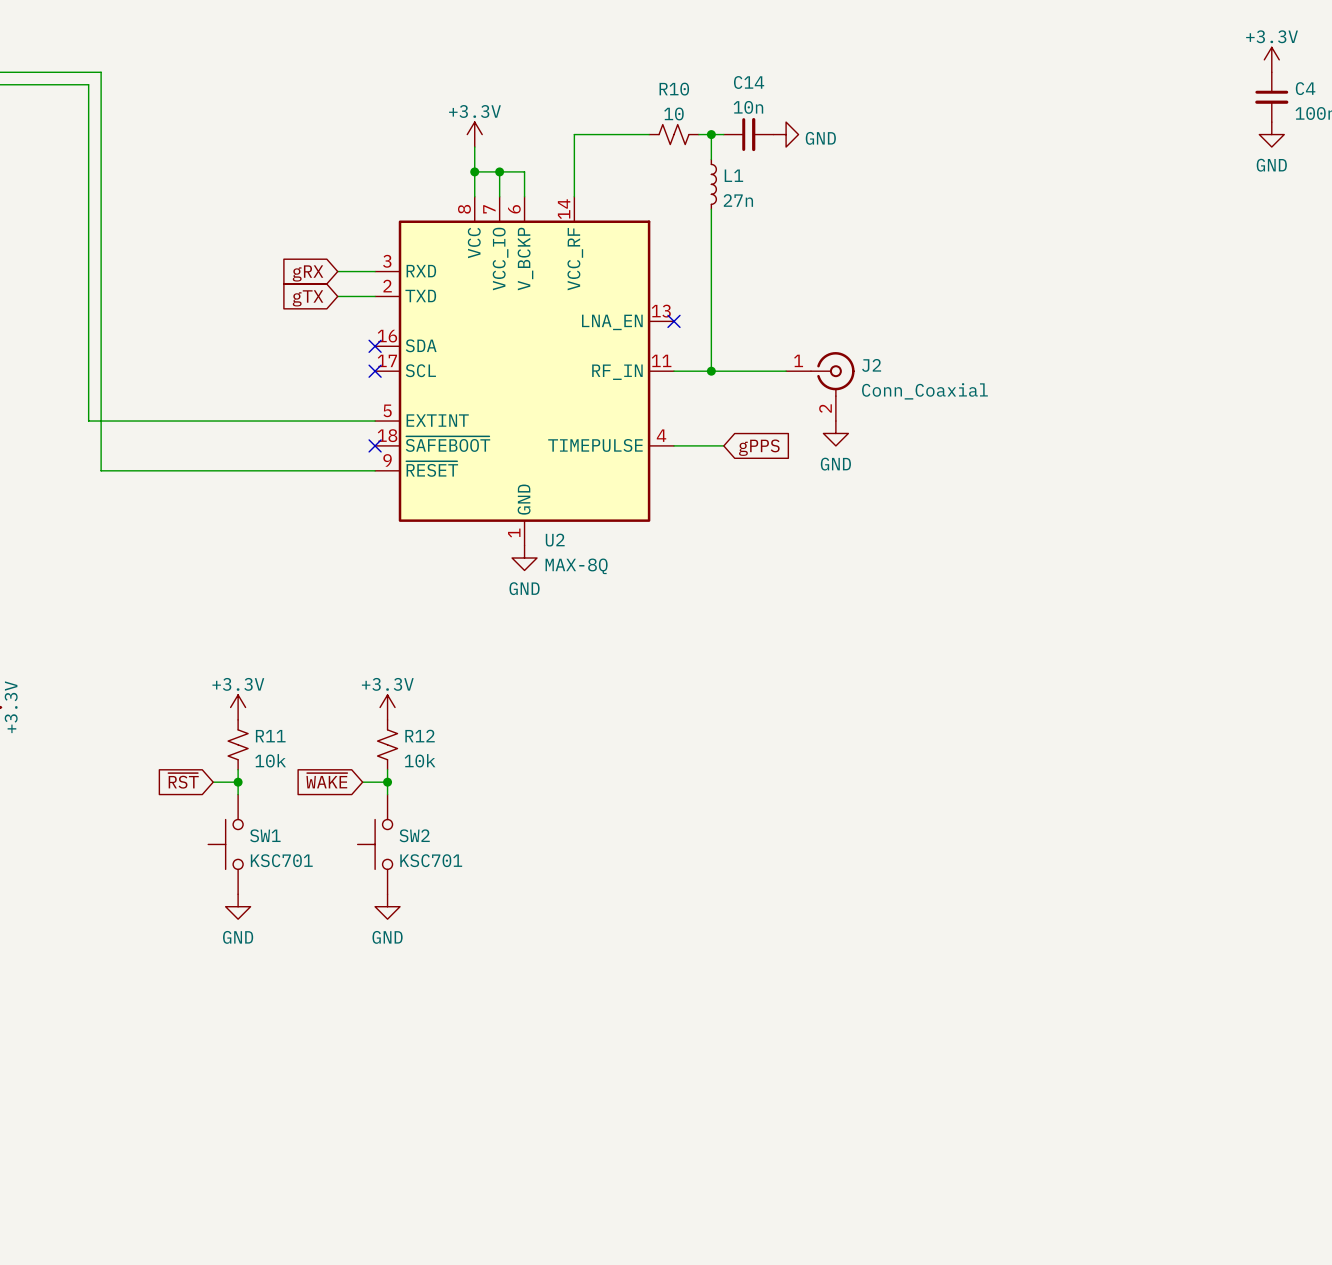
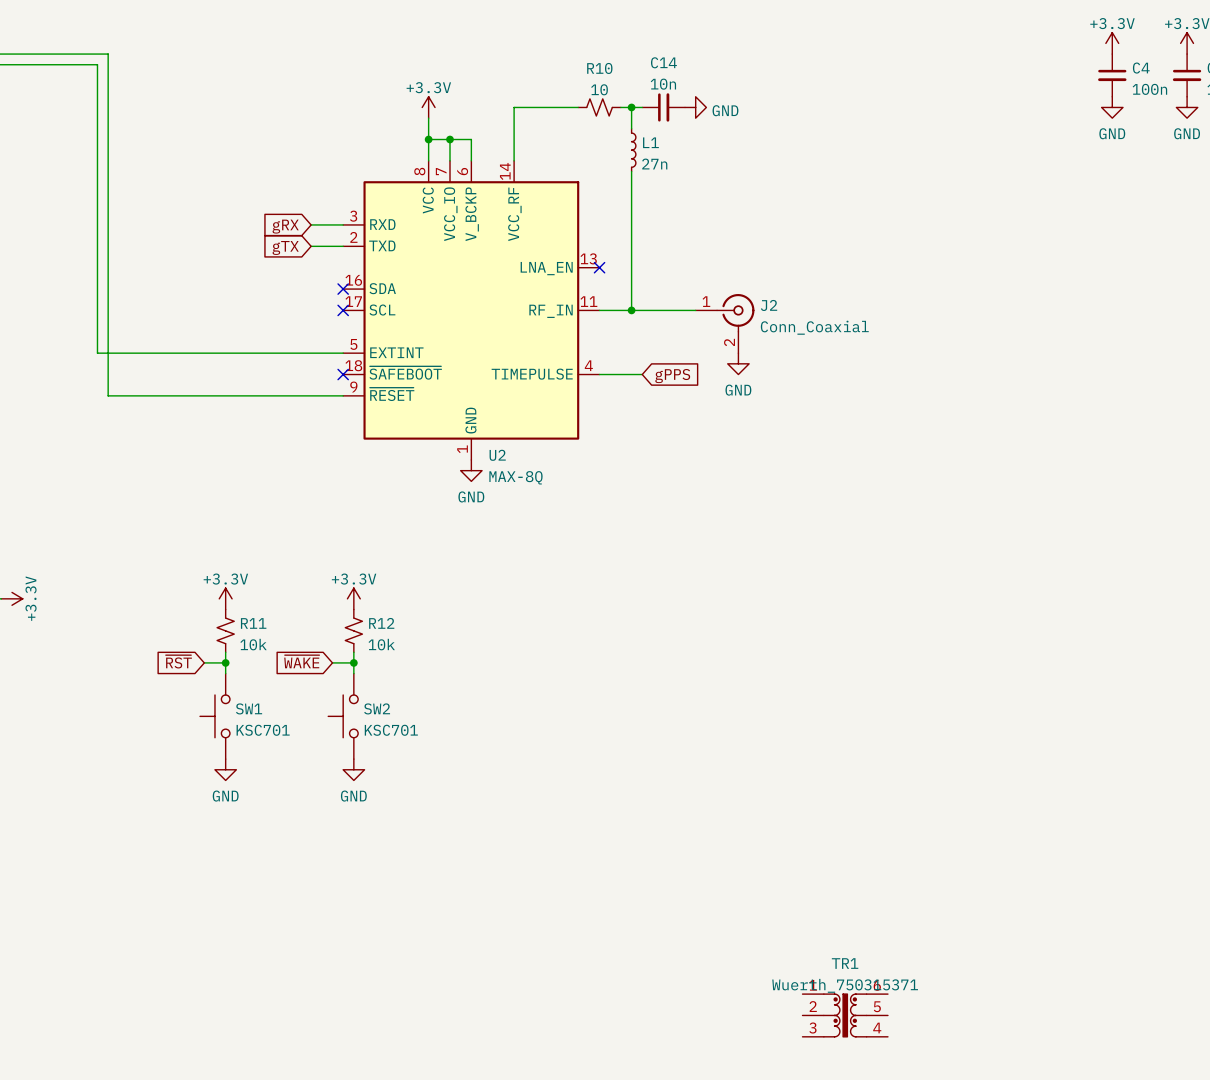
TR1: none -> Wuerth_750315371 (845, 1015)

